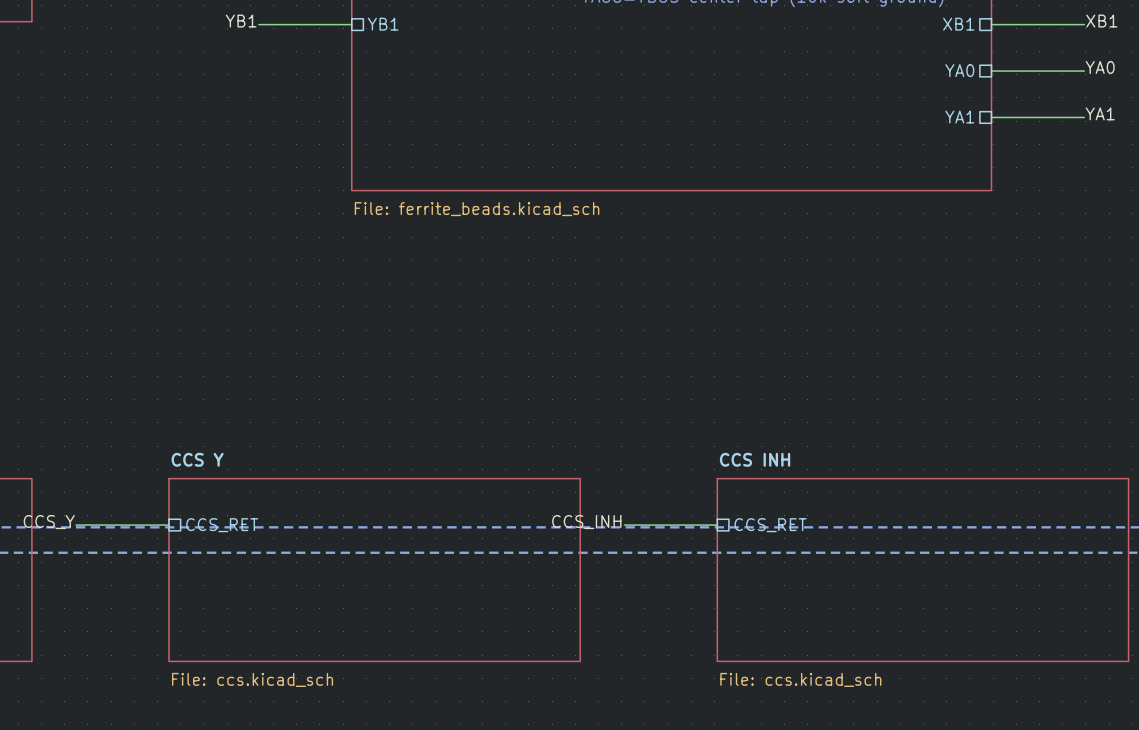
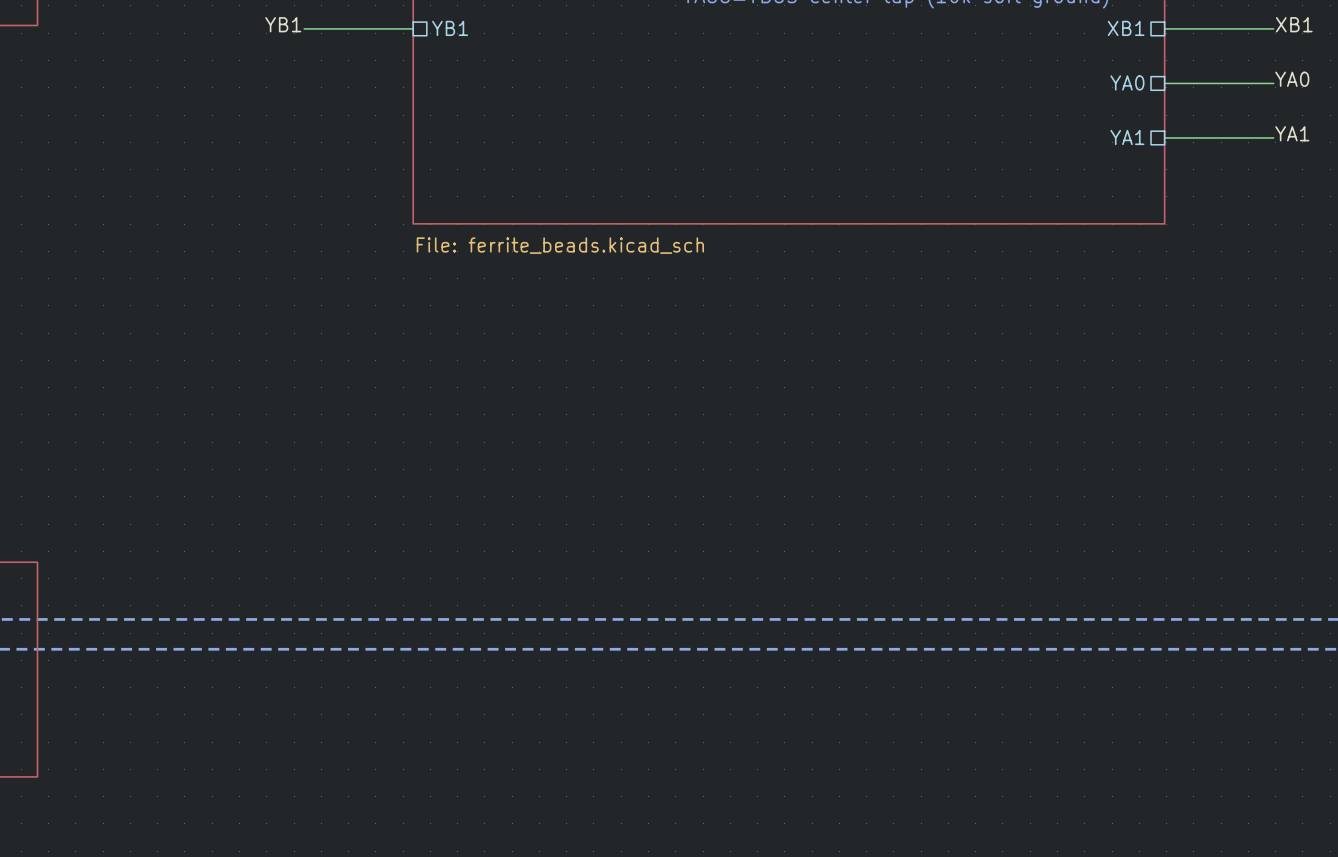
label: CCS_Y (49, 522) -> none
label: CCS_INH (586, 522) -> none
wire: (76, 525) (168, 525) -> none
sheet pin: CCS_RET (222, 525) -> none
wire: (624, 525) (717, 525) -> none
sheet pin: CCS_RET (770, 525) -> none
sheet CCS Y: File: ccs.kicad_sch (374, 570) -> none
sheet CCS INH: File: ccs.kicad_sch (922, 570) -> none

